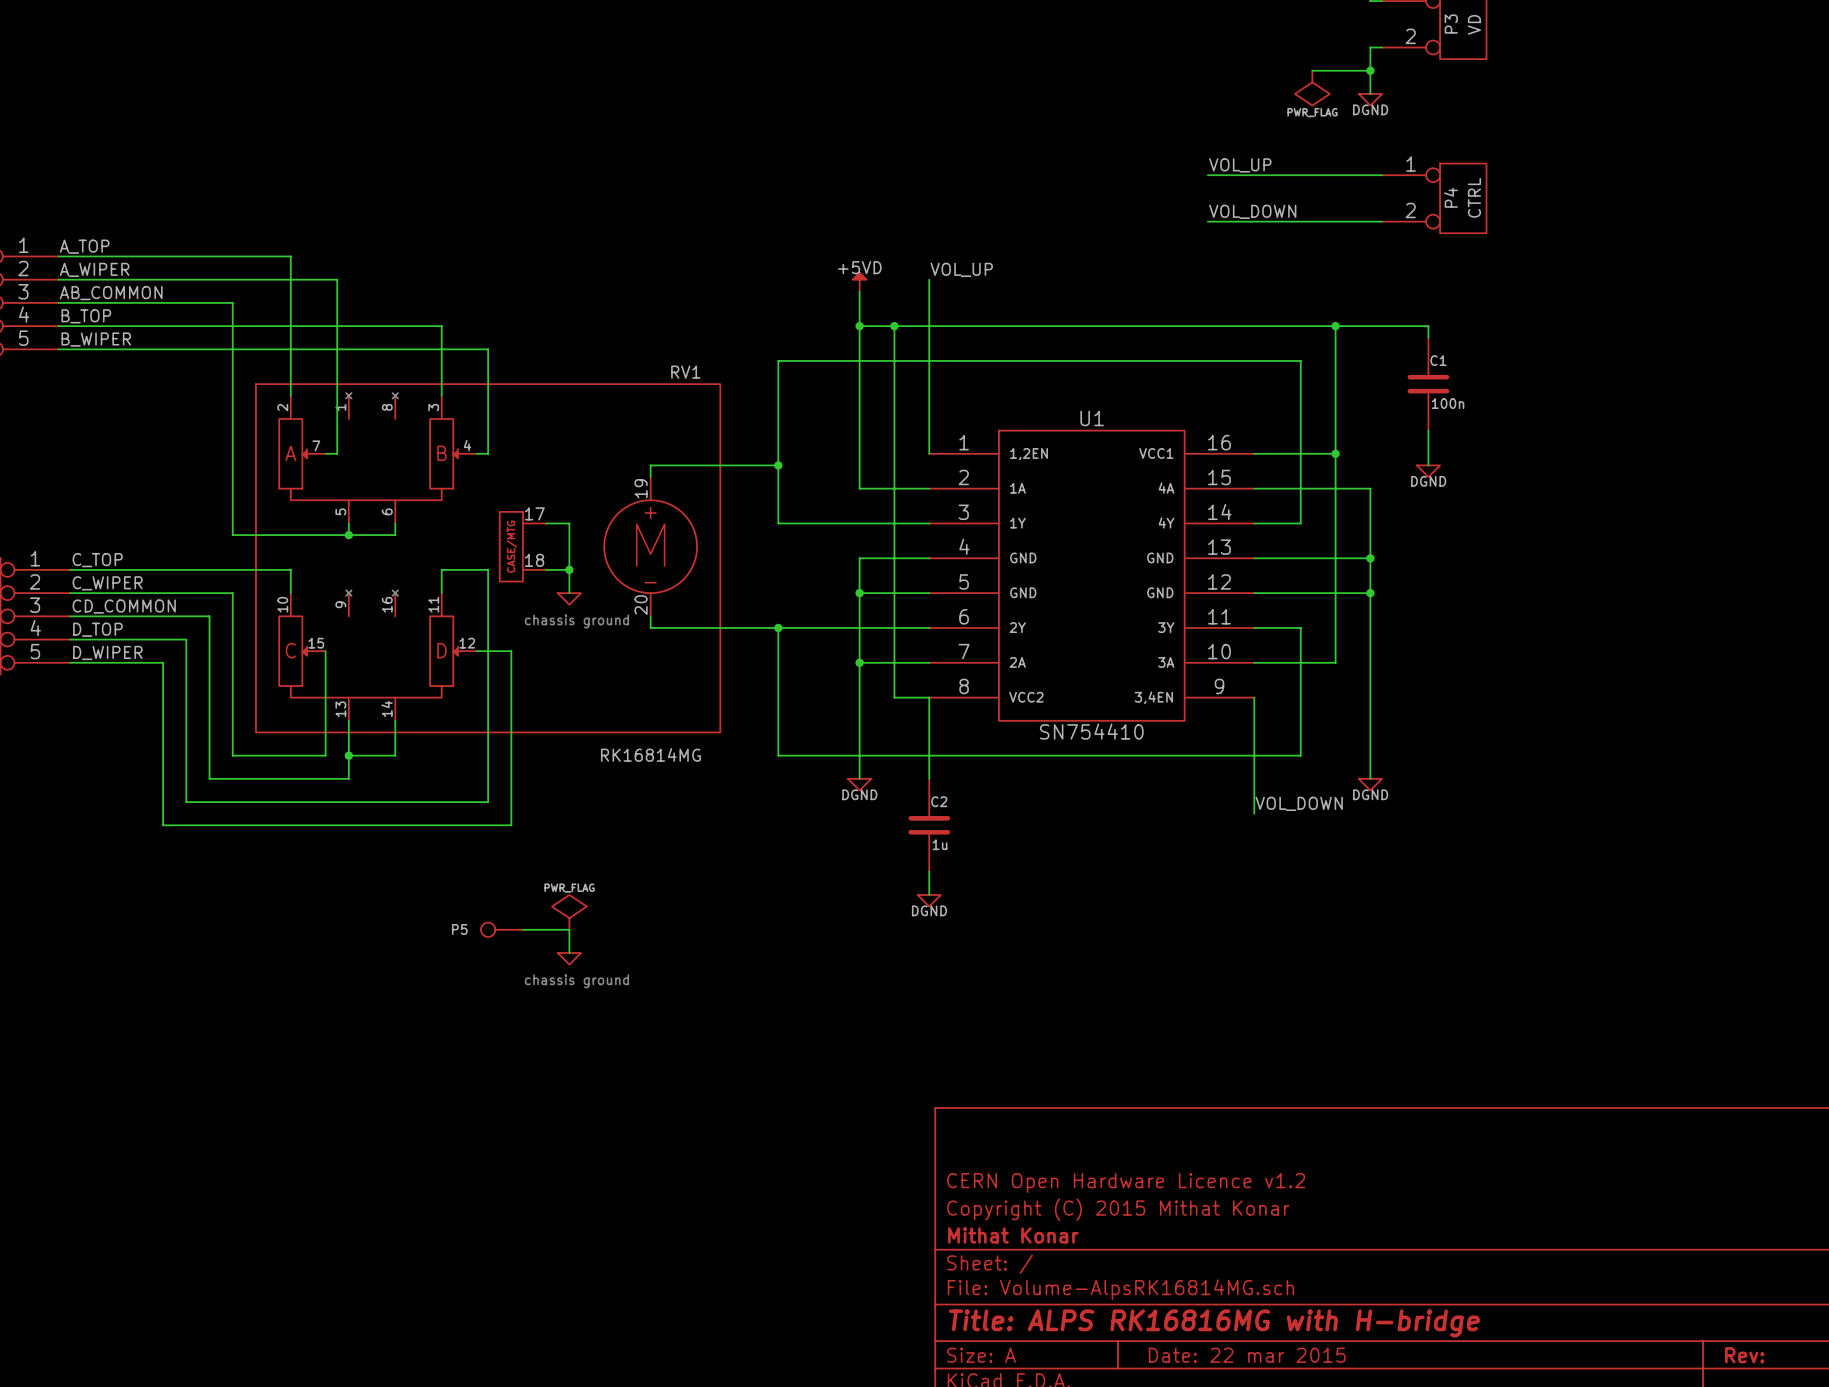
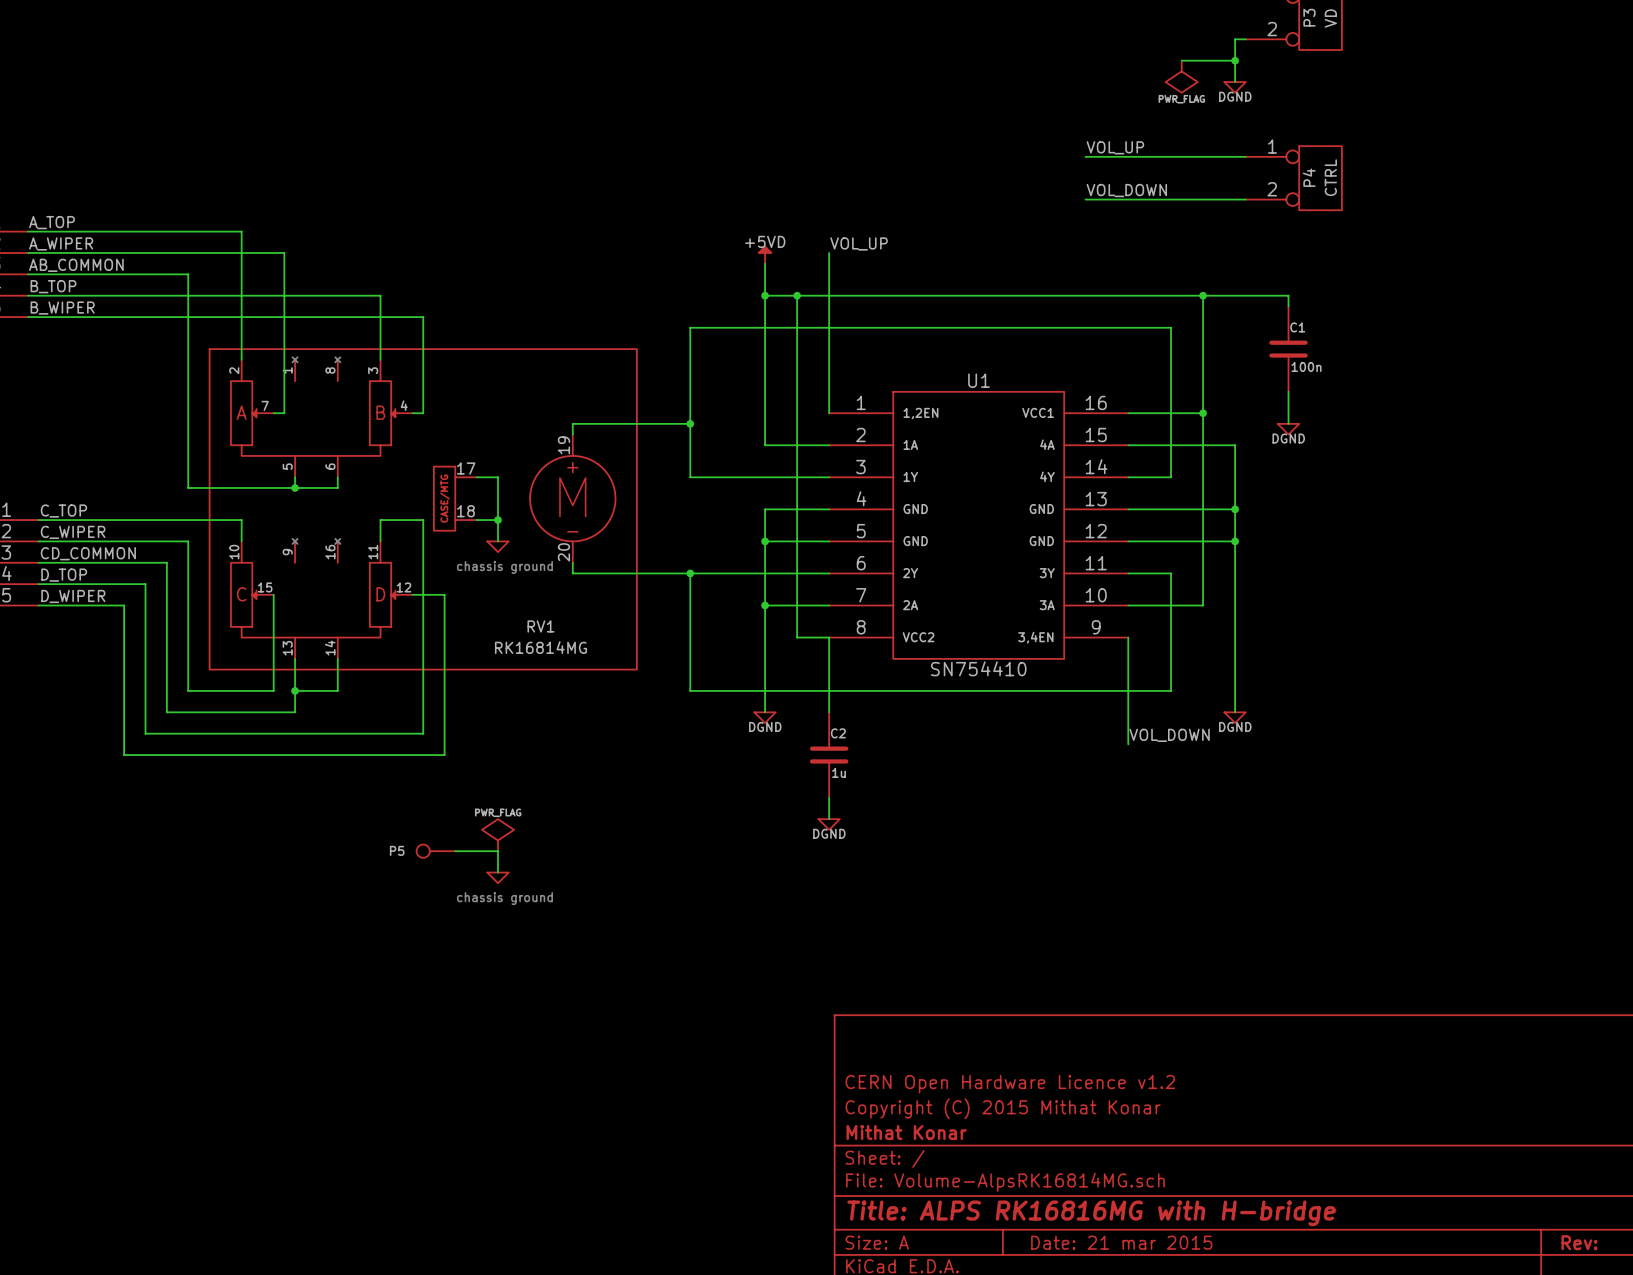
RV1 name position: RV1 (685, 372) -> RV1 (541, 626)
RV1 value position: RK16814MG (650, 754) -> RK16814MG (541, 647)
title block: Date: 22 mar 2015 (1247, 1355) -> Date: 21 mar 2015 (1121, 1242)

